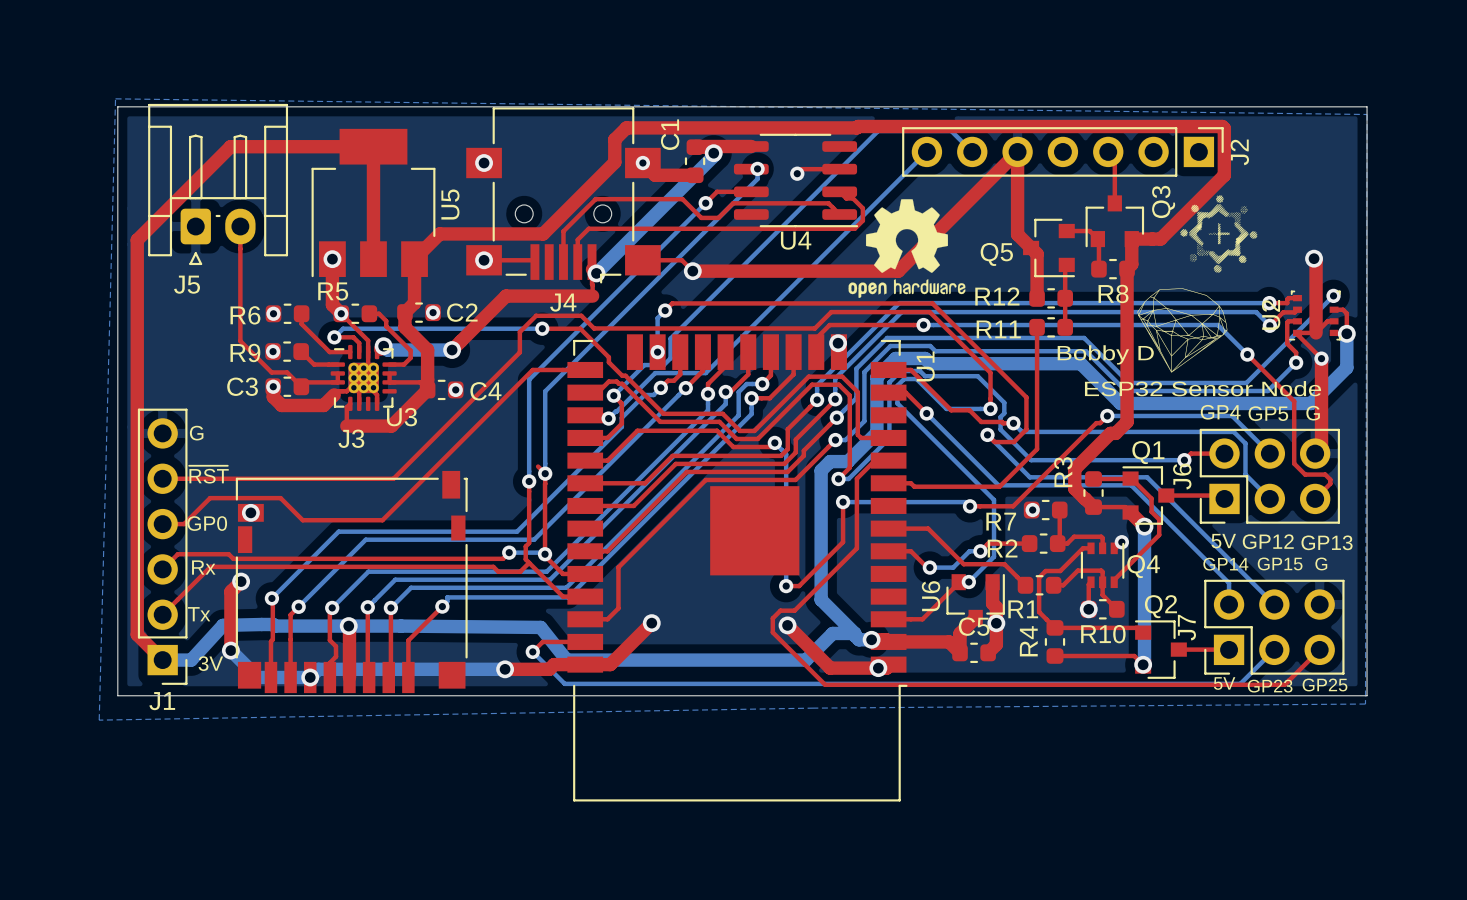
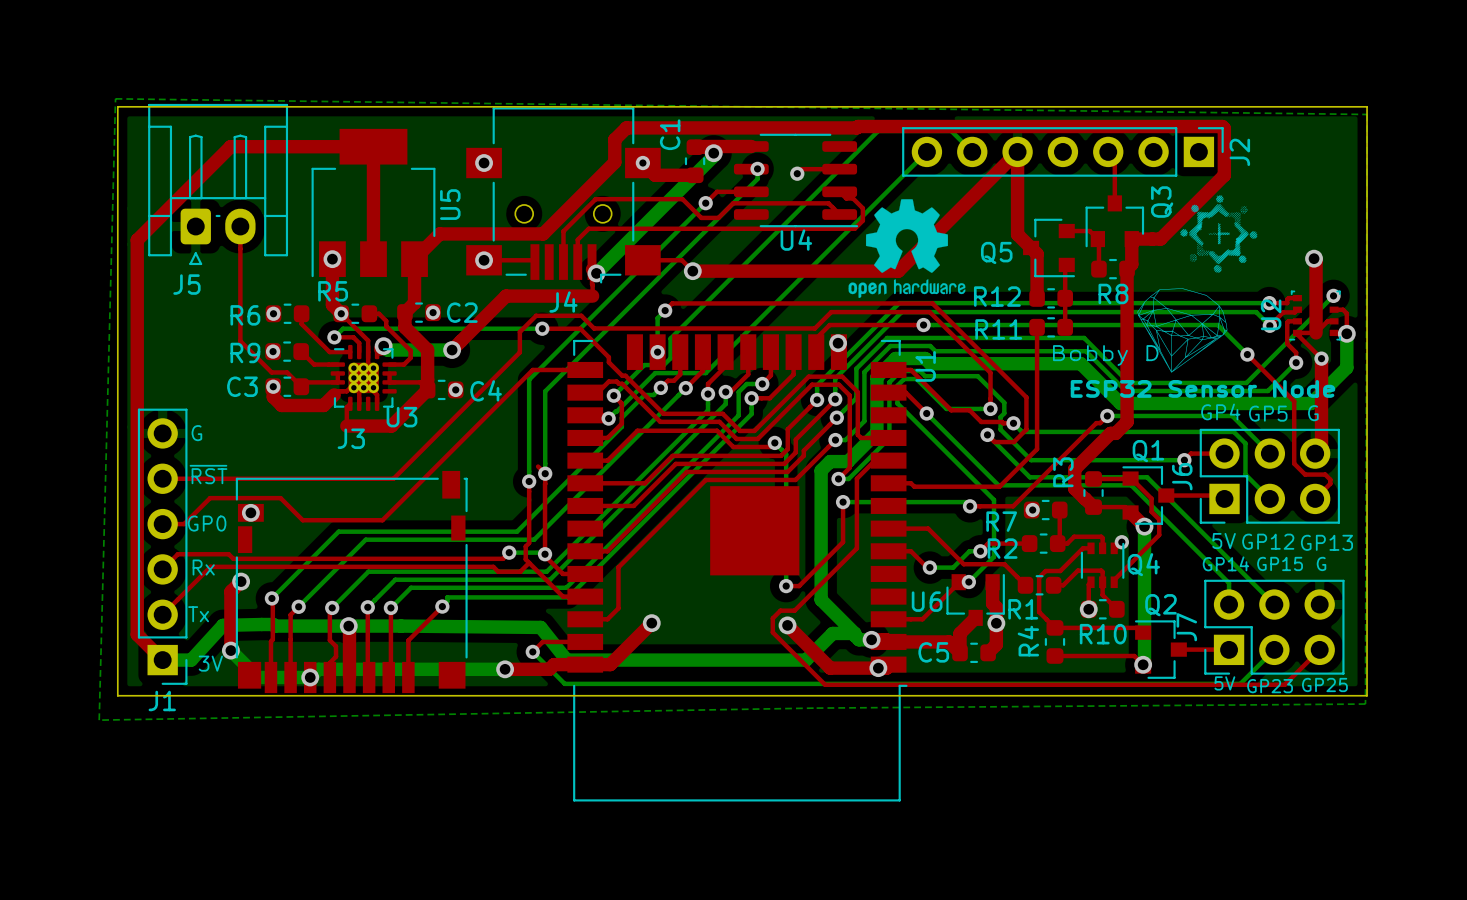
U6 name rotation: 0° (931, 596) -> 90° clockwise (927, 601)
C5 name position: C5 (974, 626) -> C5 (933, 652)

